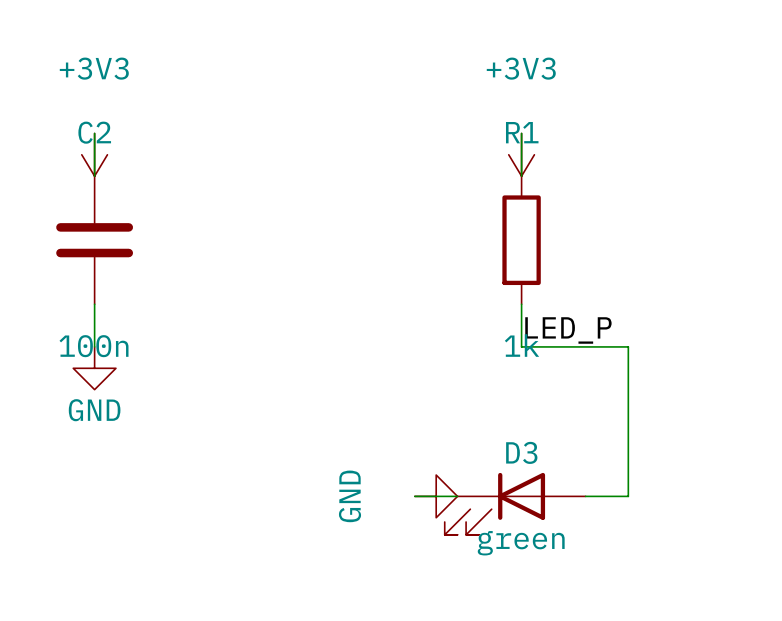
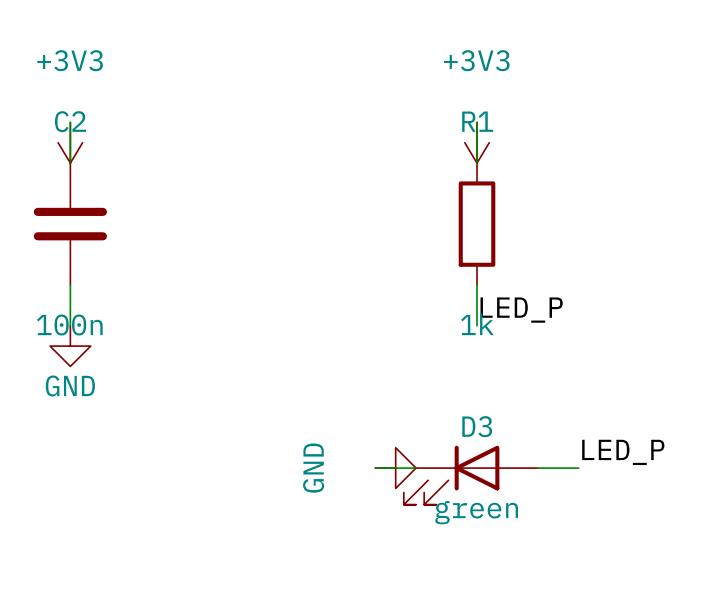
wire: (521, 346) (628, 346) (628, 496) -> none
label: none -> LED_P (623, 452)

